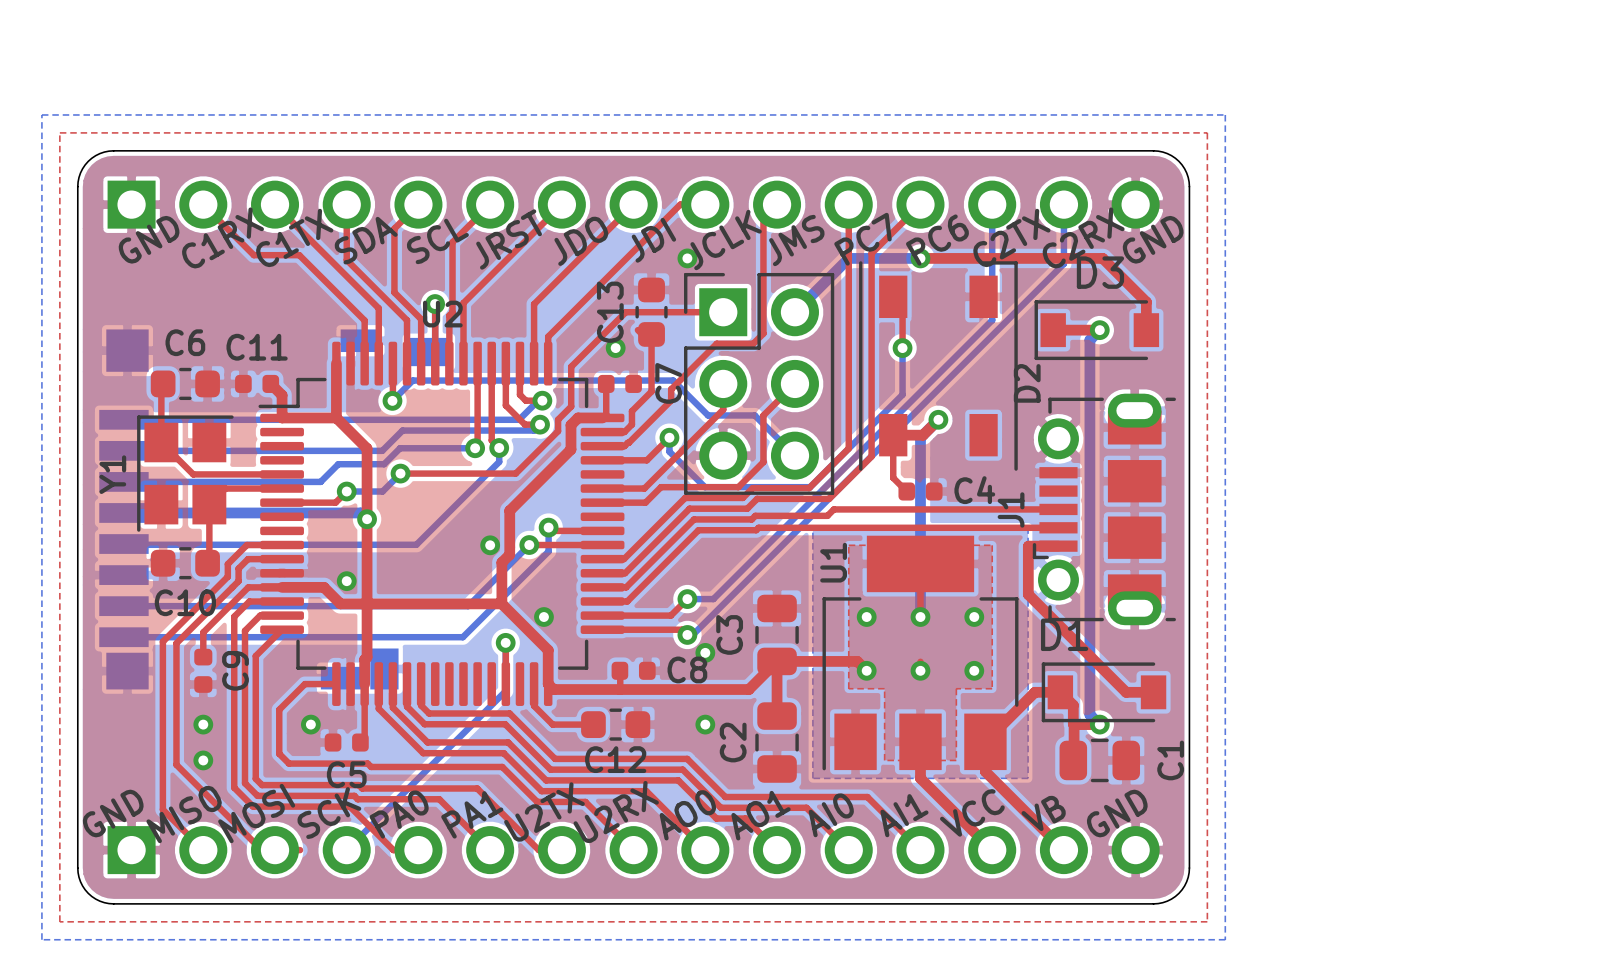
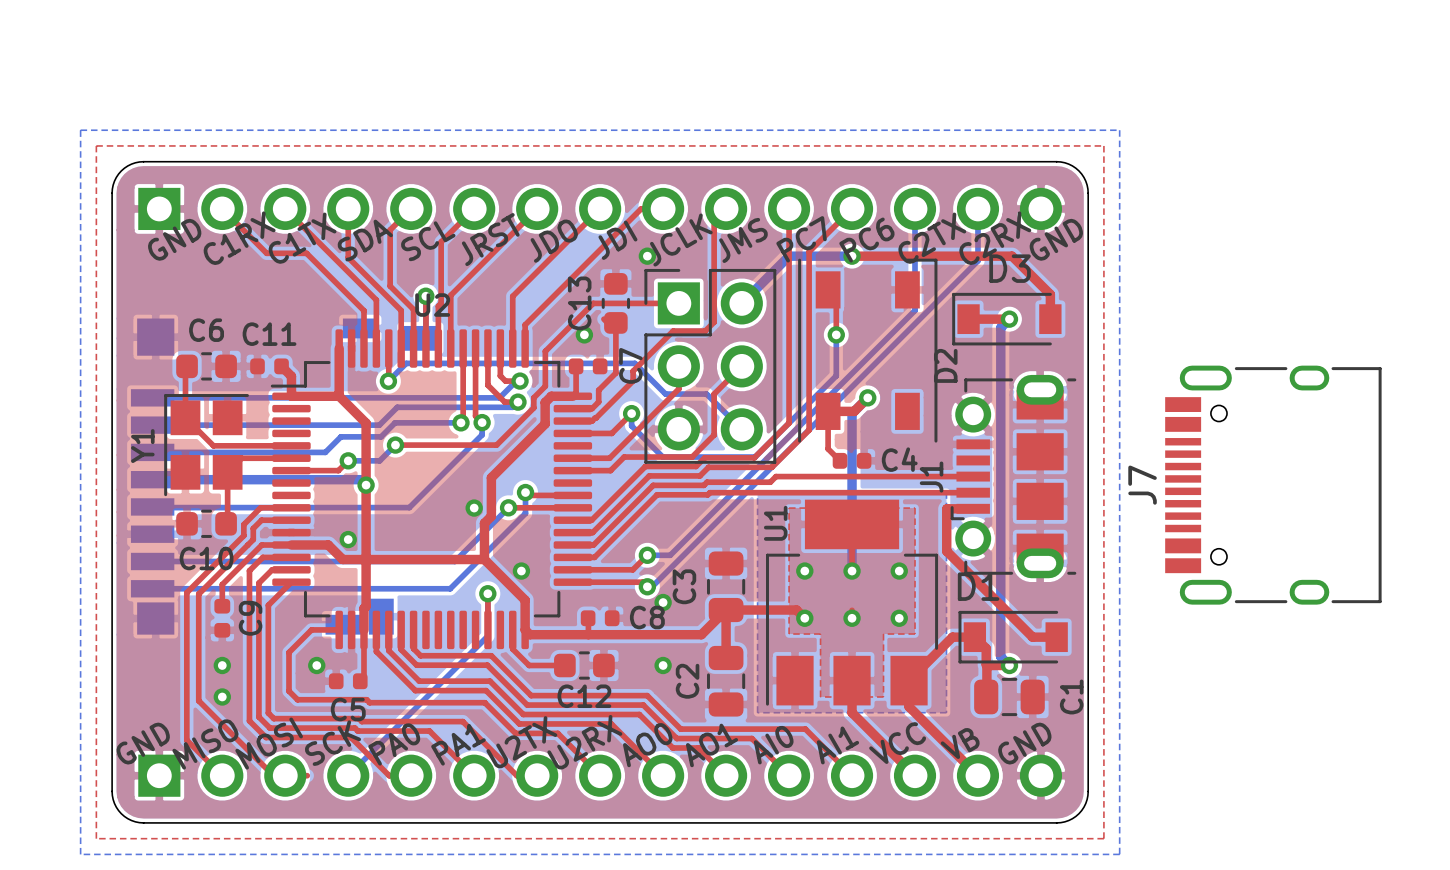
J7: none -> (1273, 485)

